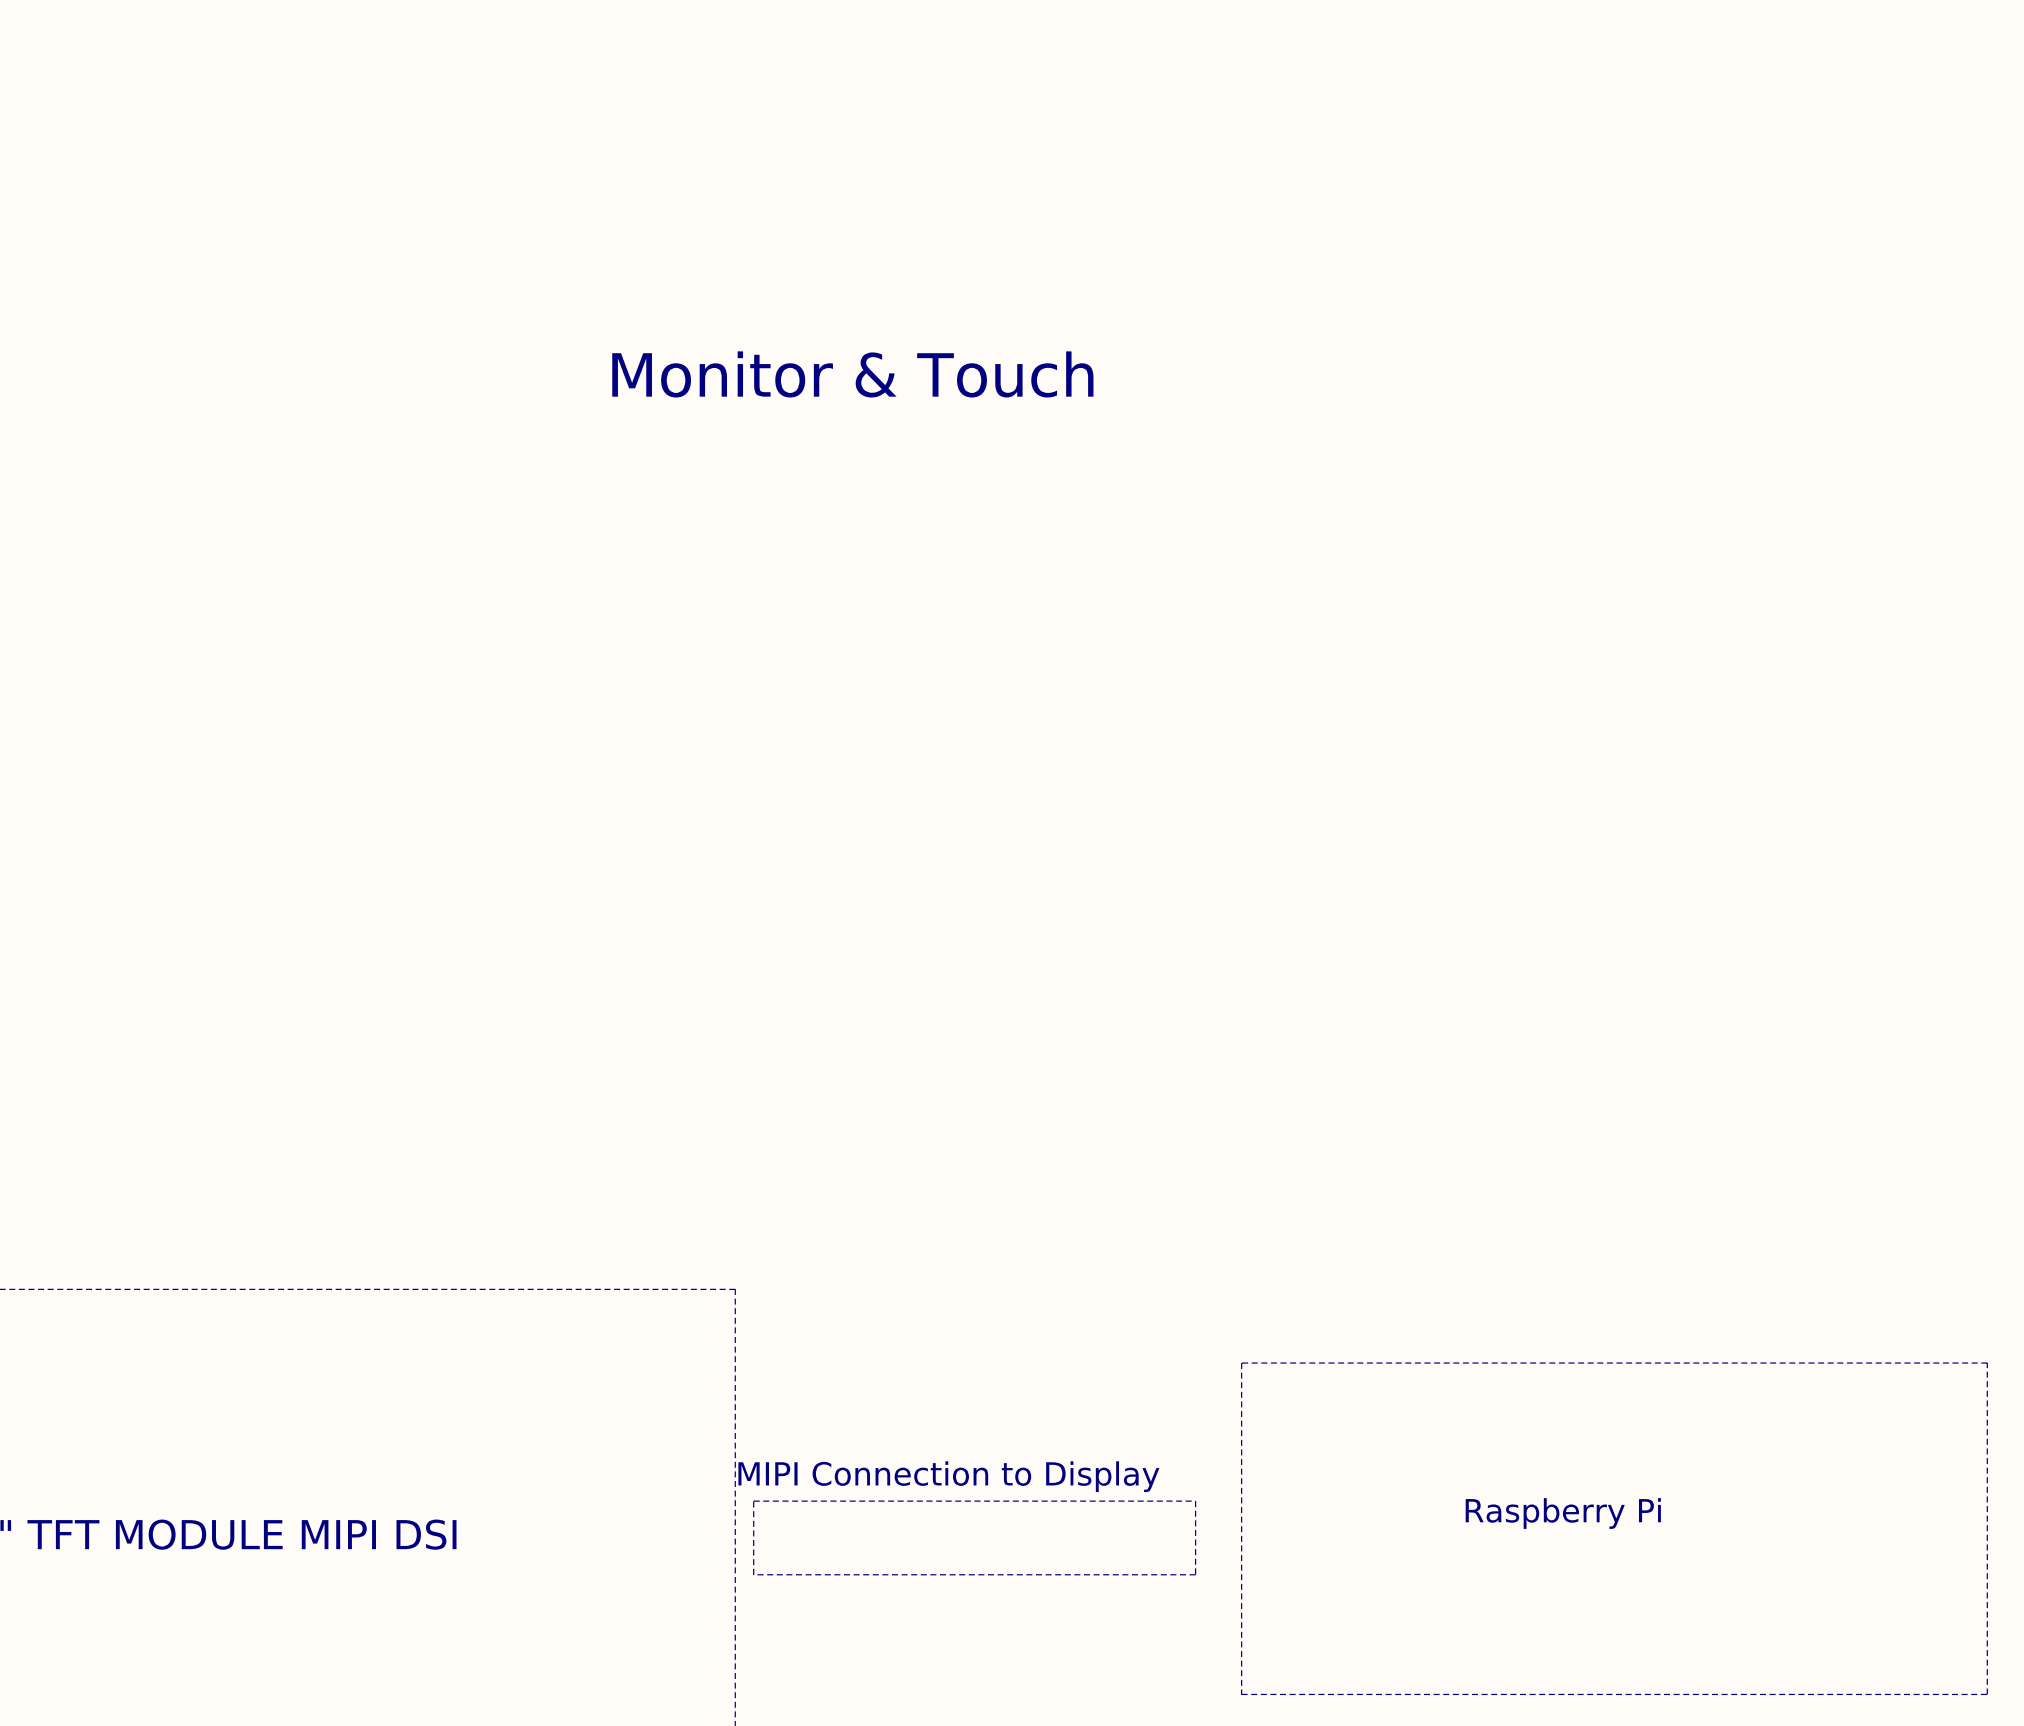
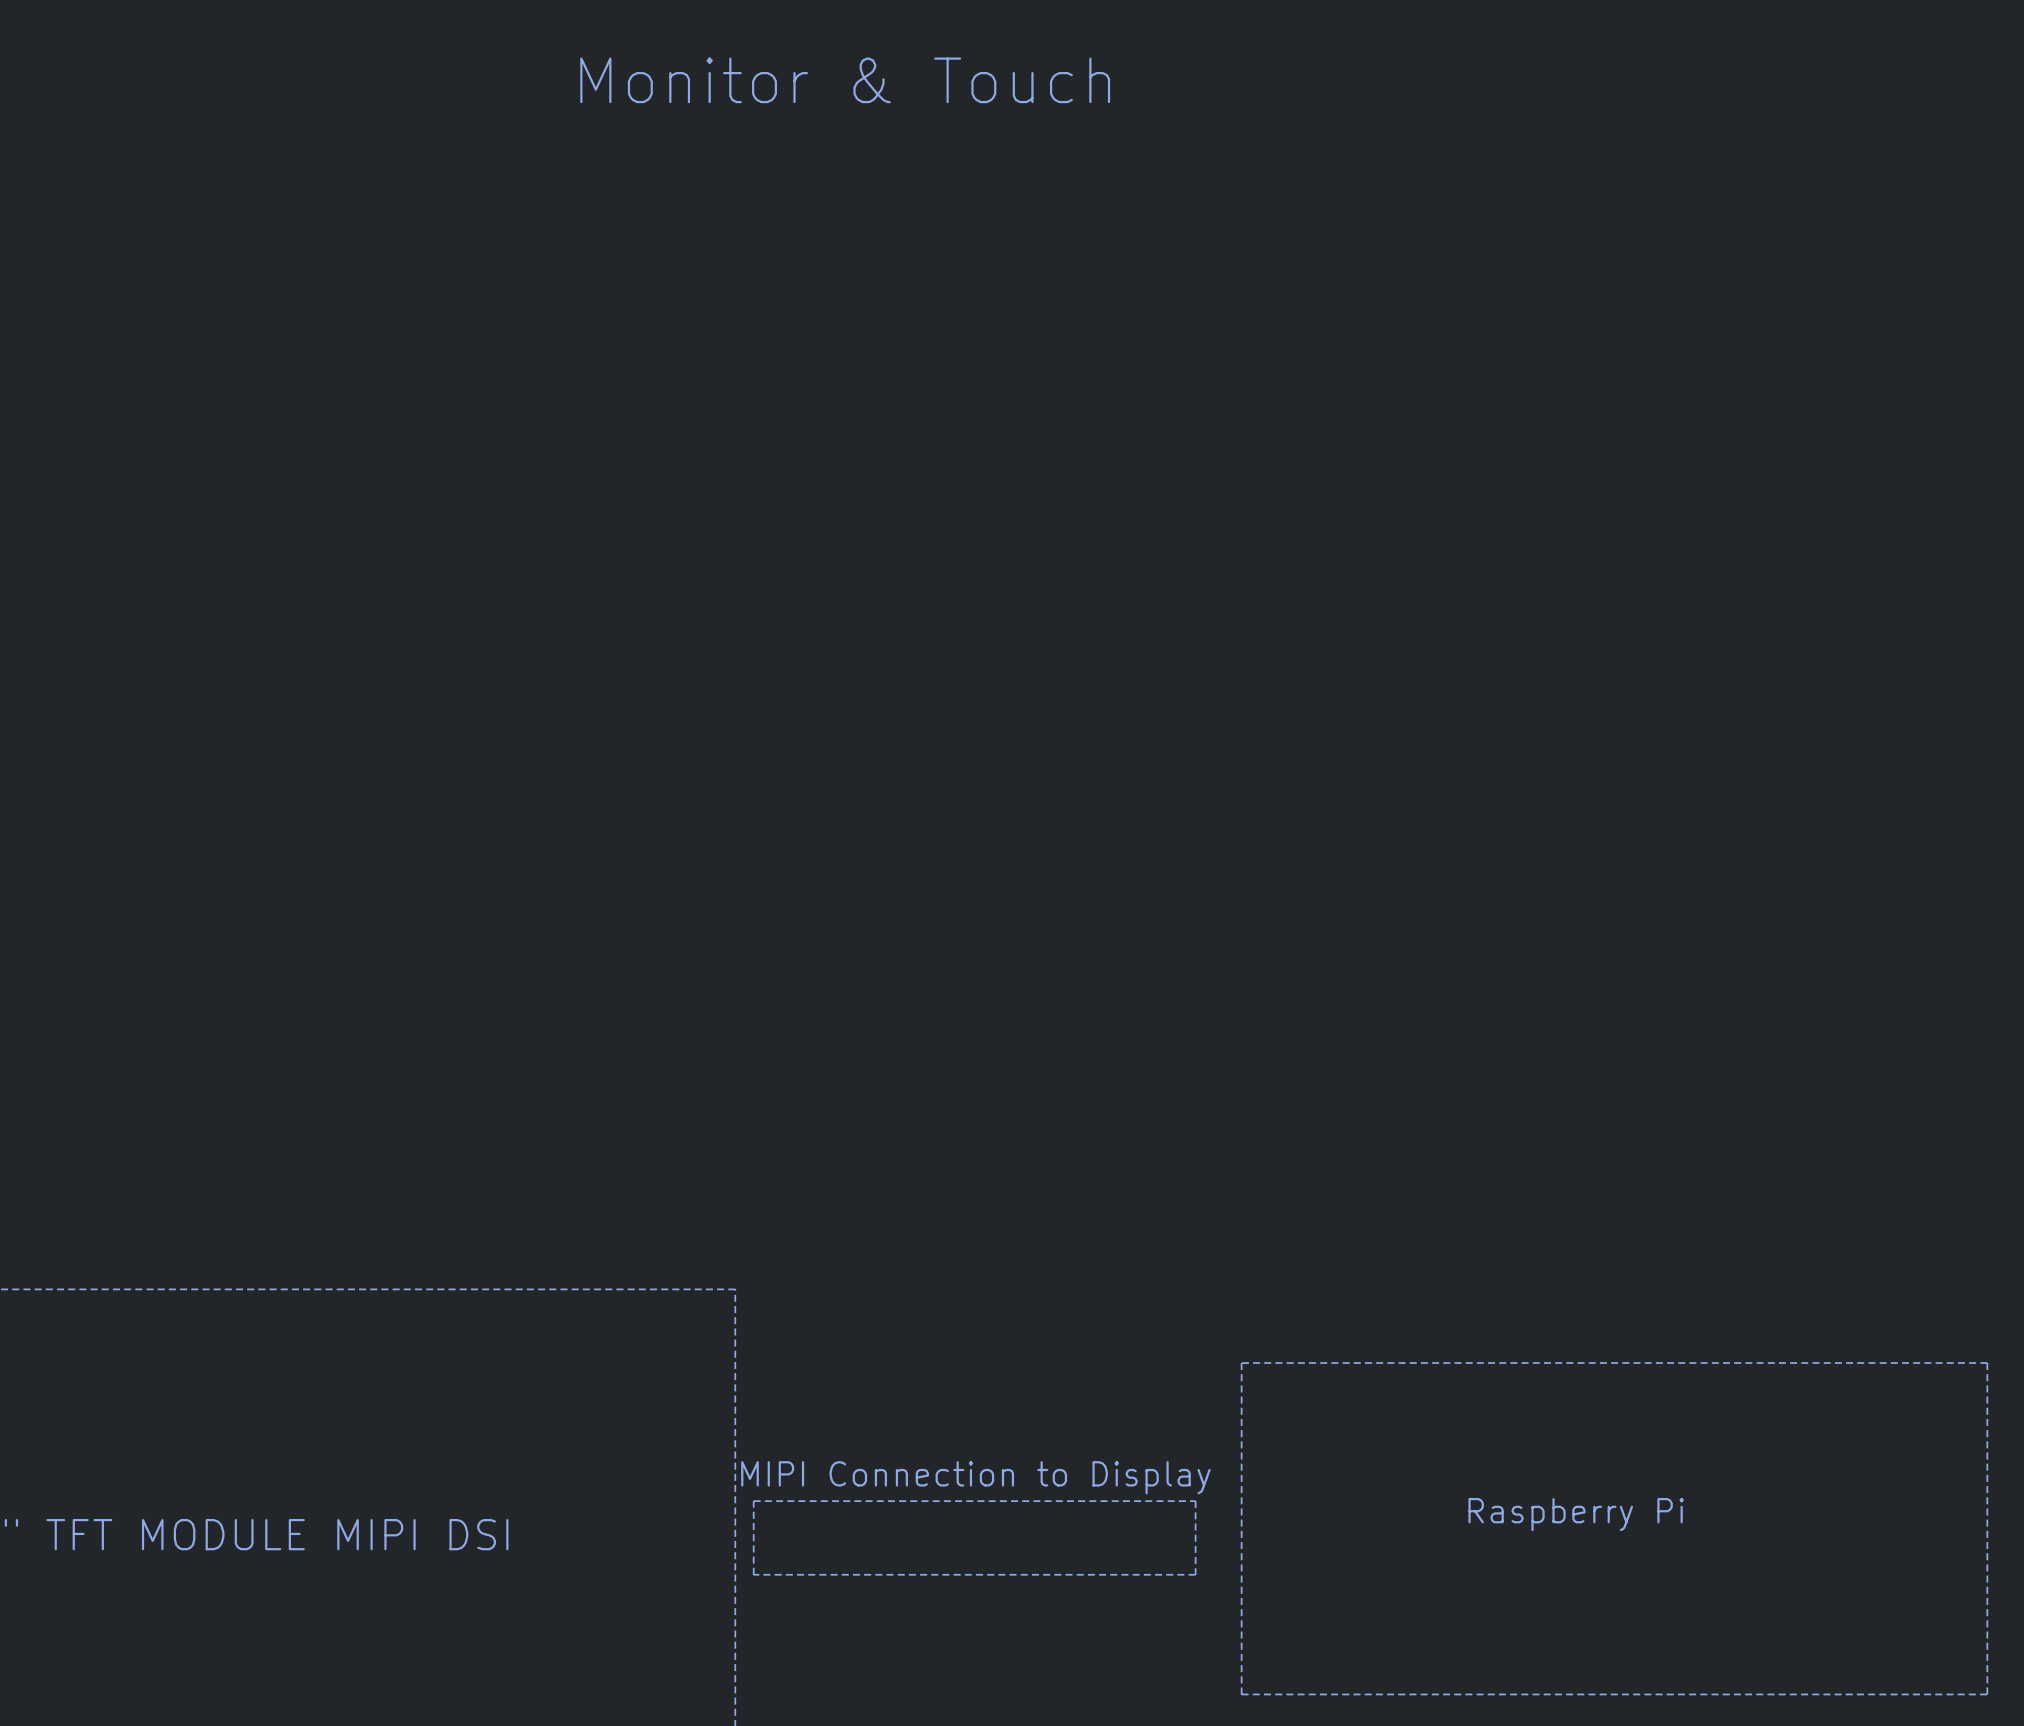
text position: Monitor & Touch (852, 374) -> Monitor & Touch (845, 80)

